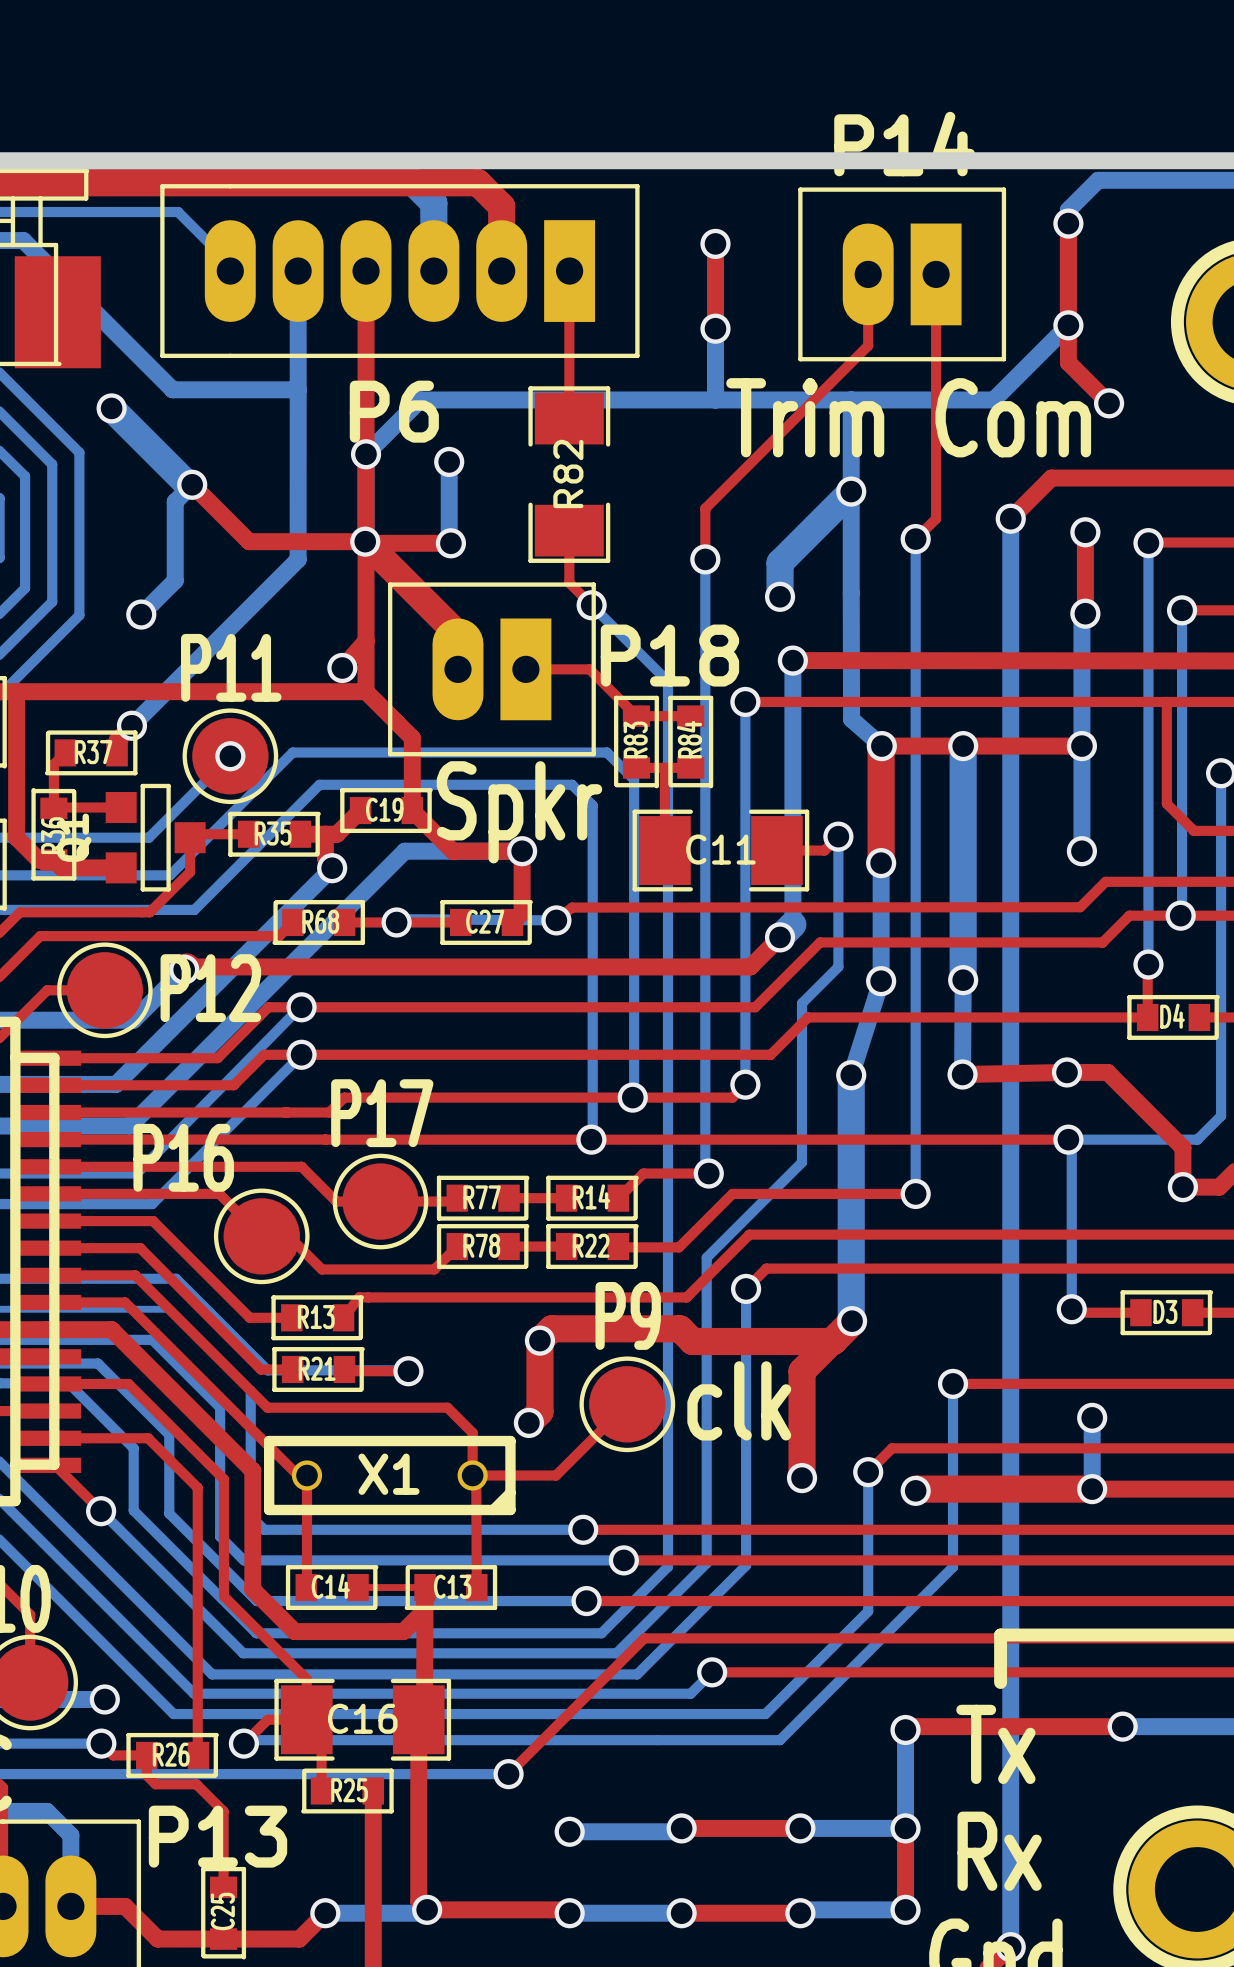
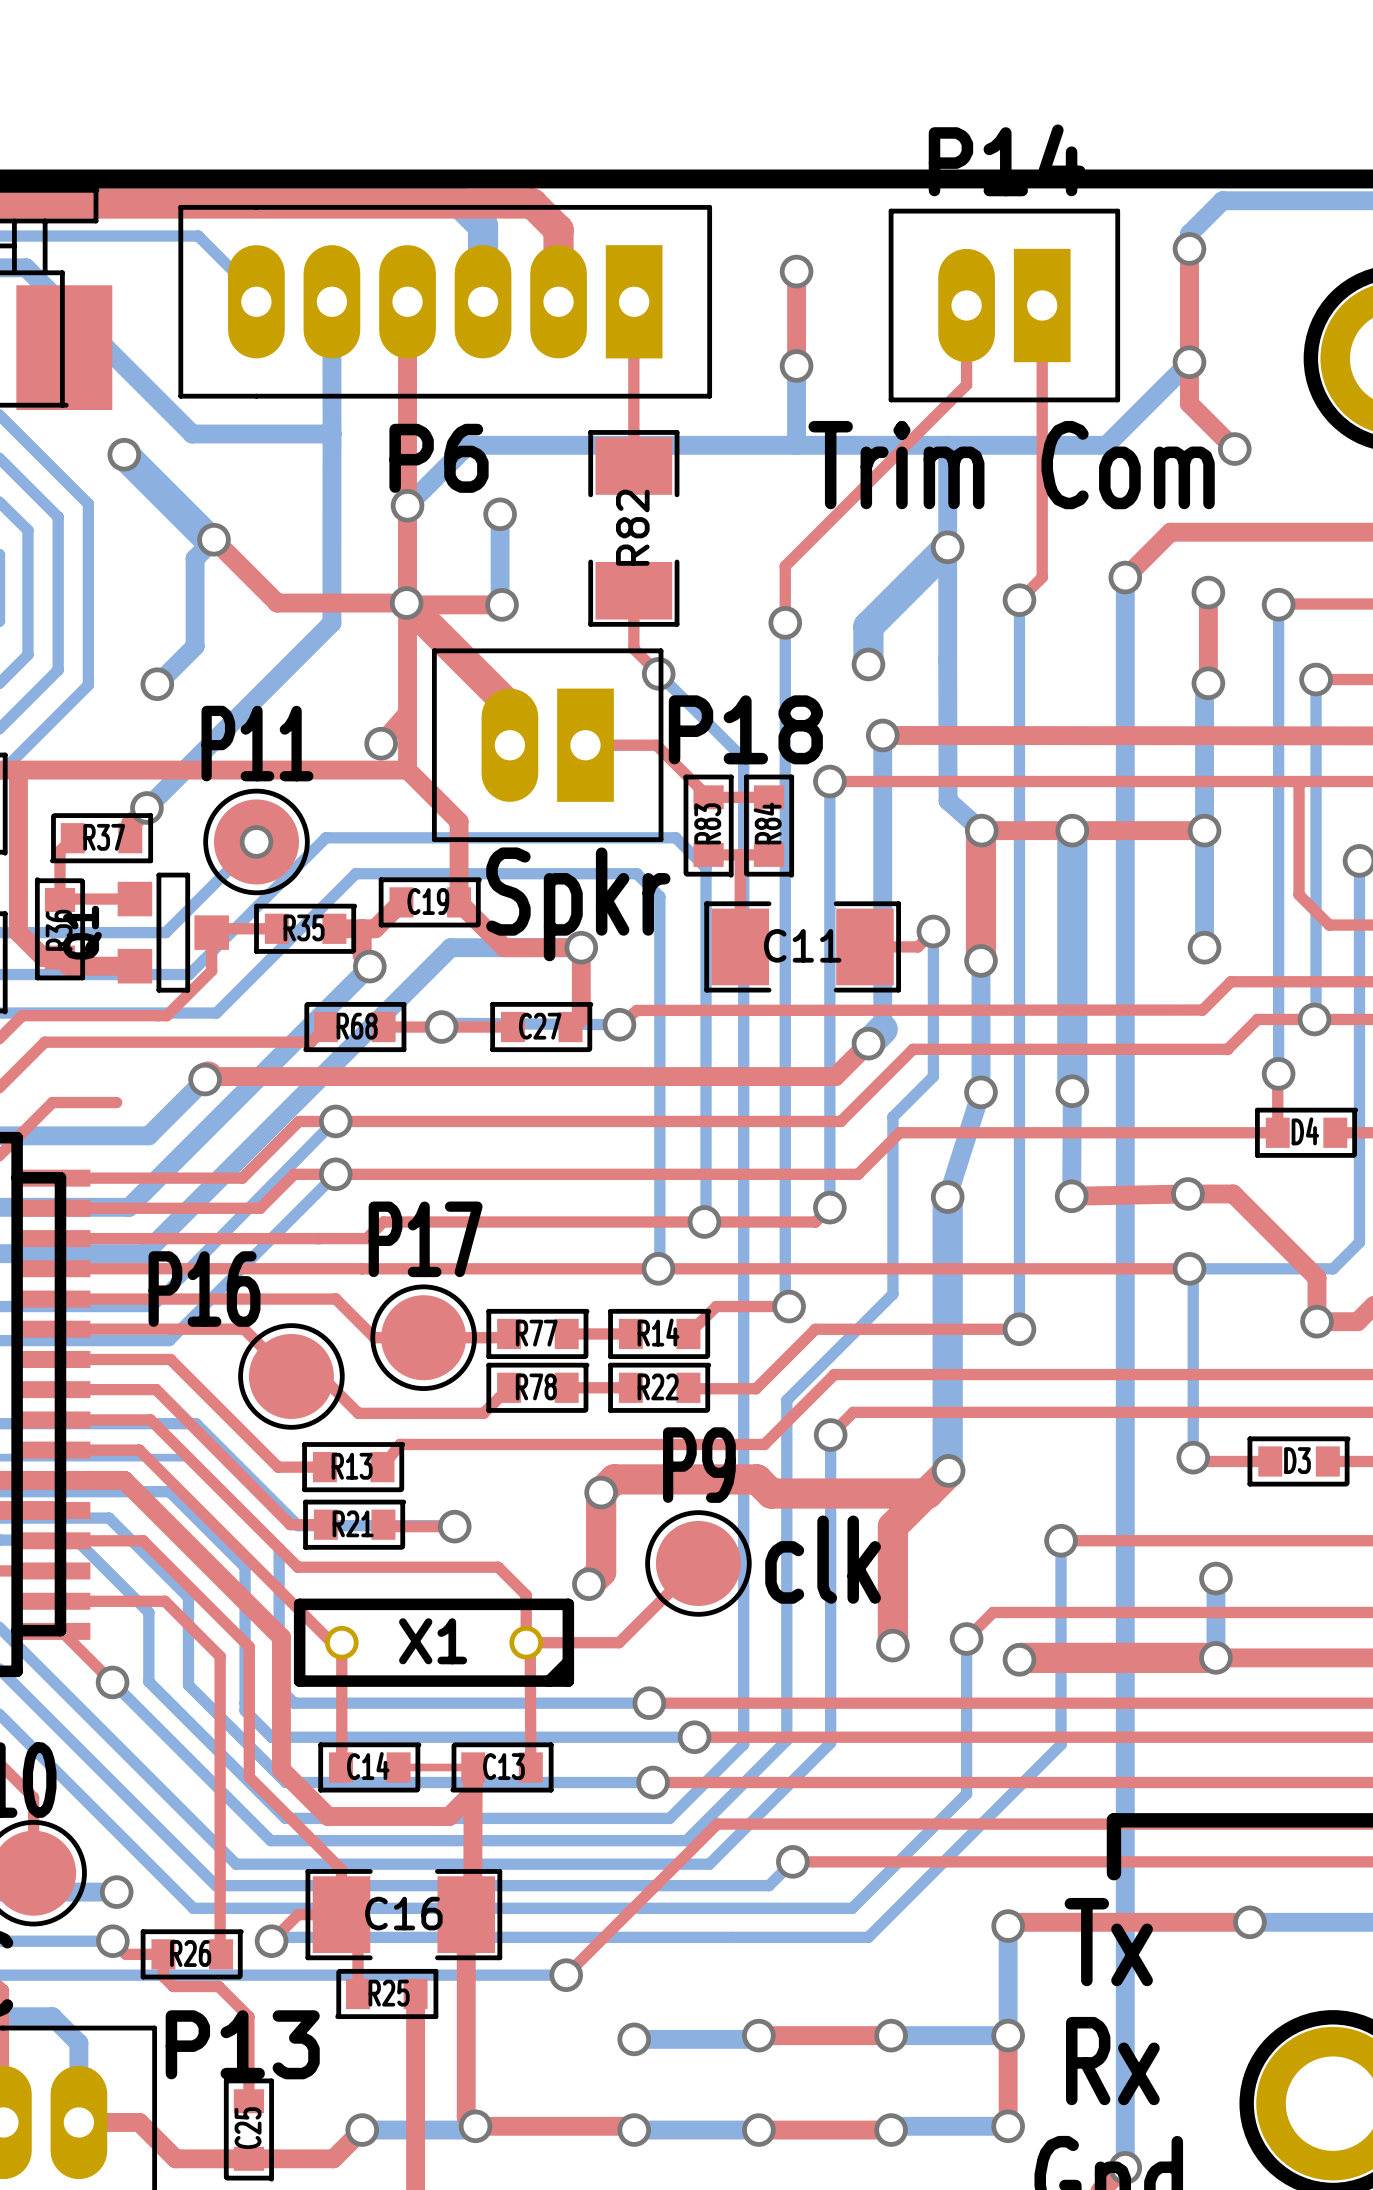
P12: (104, 990) -> none

